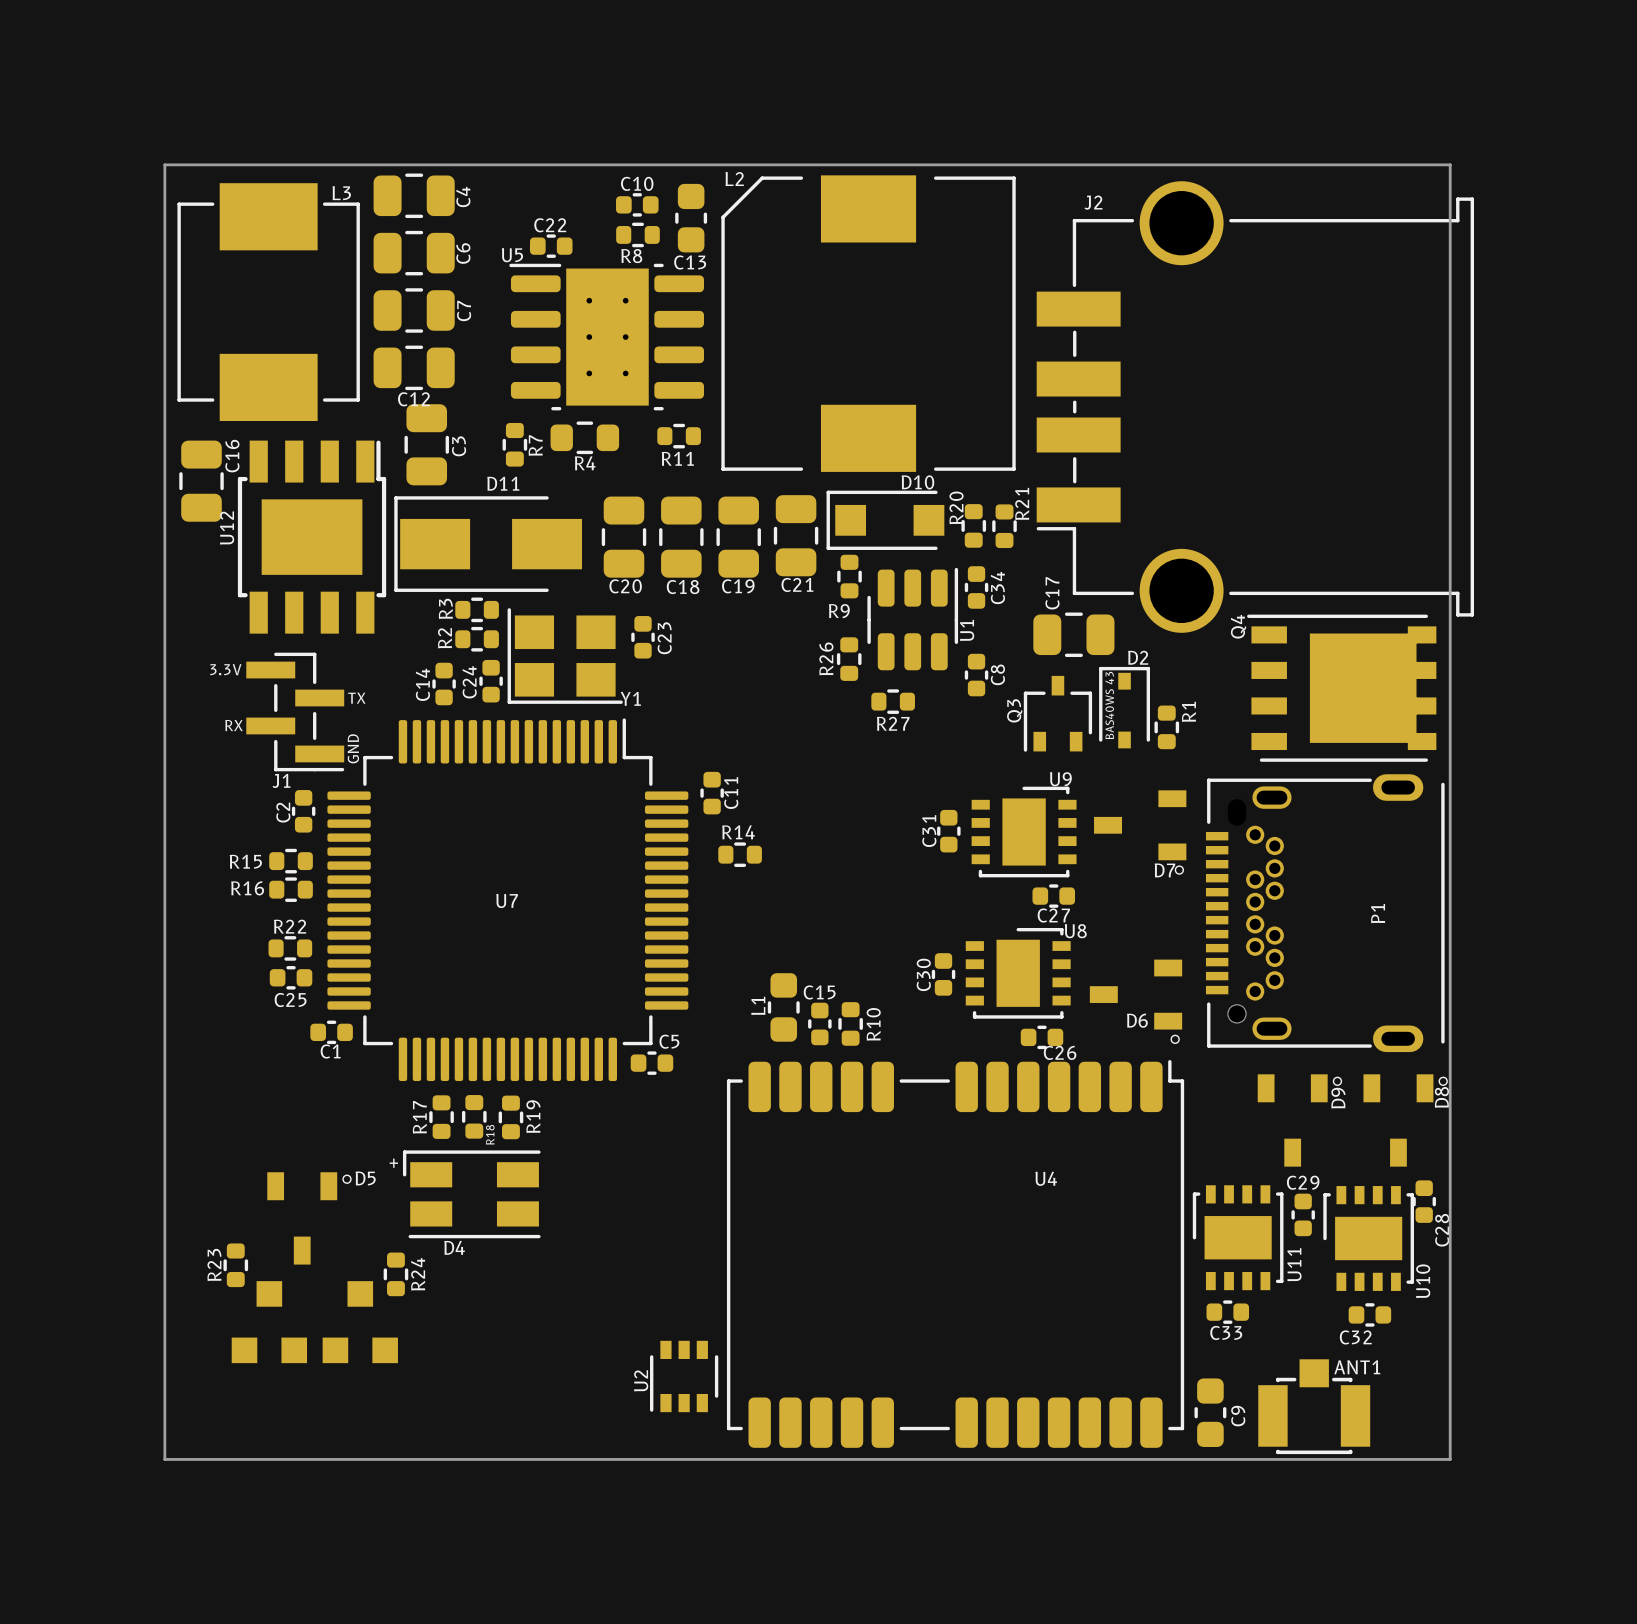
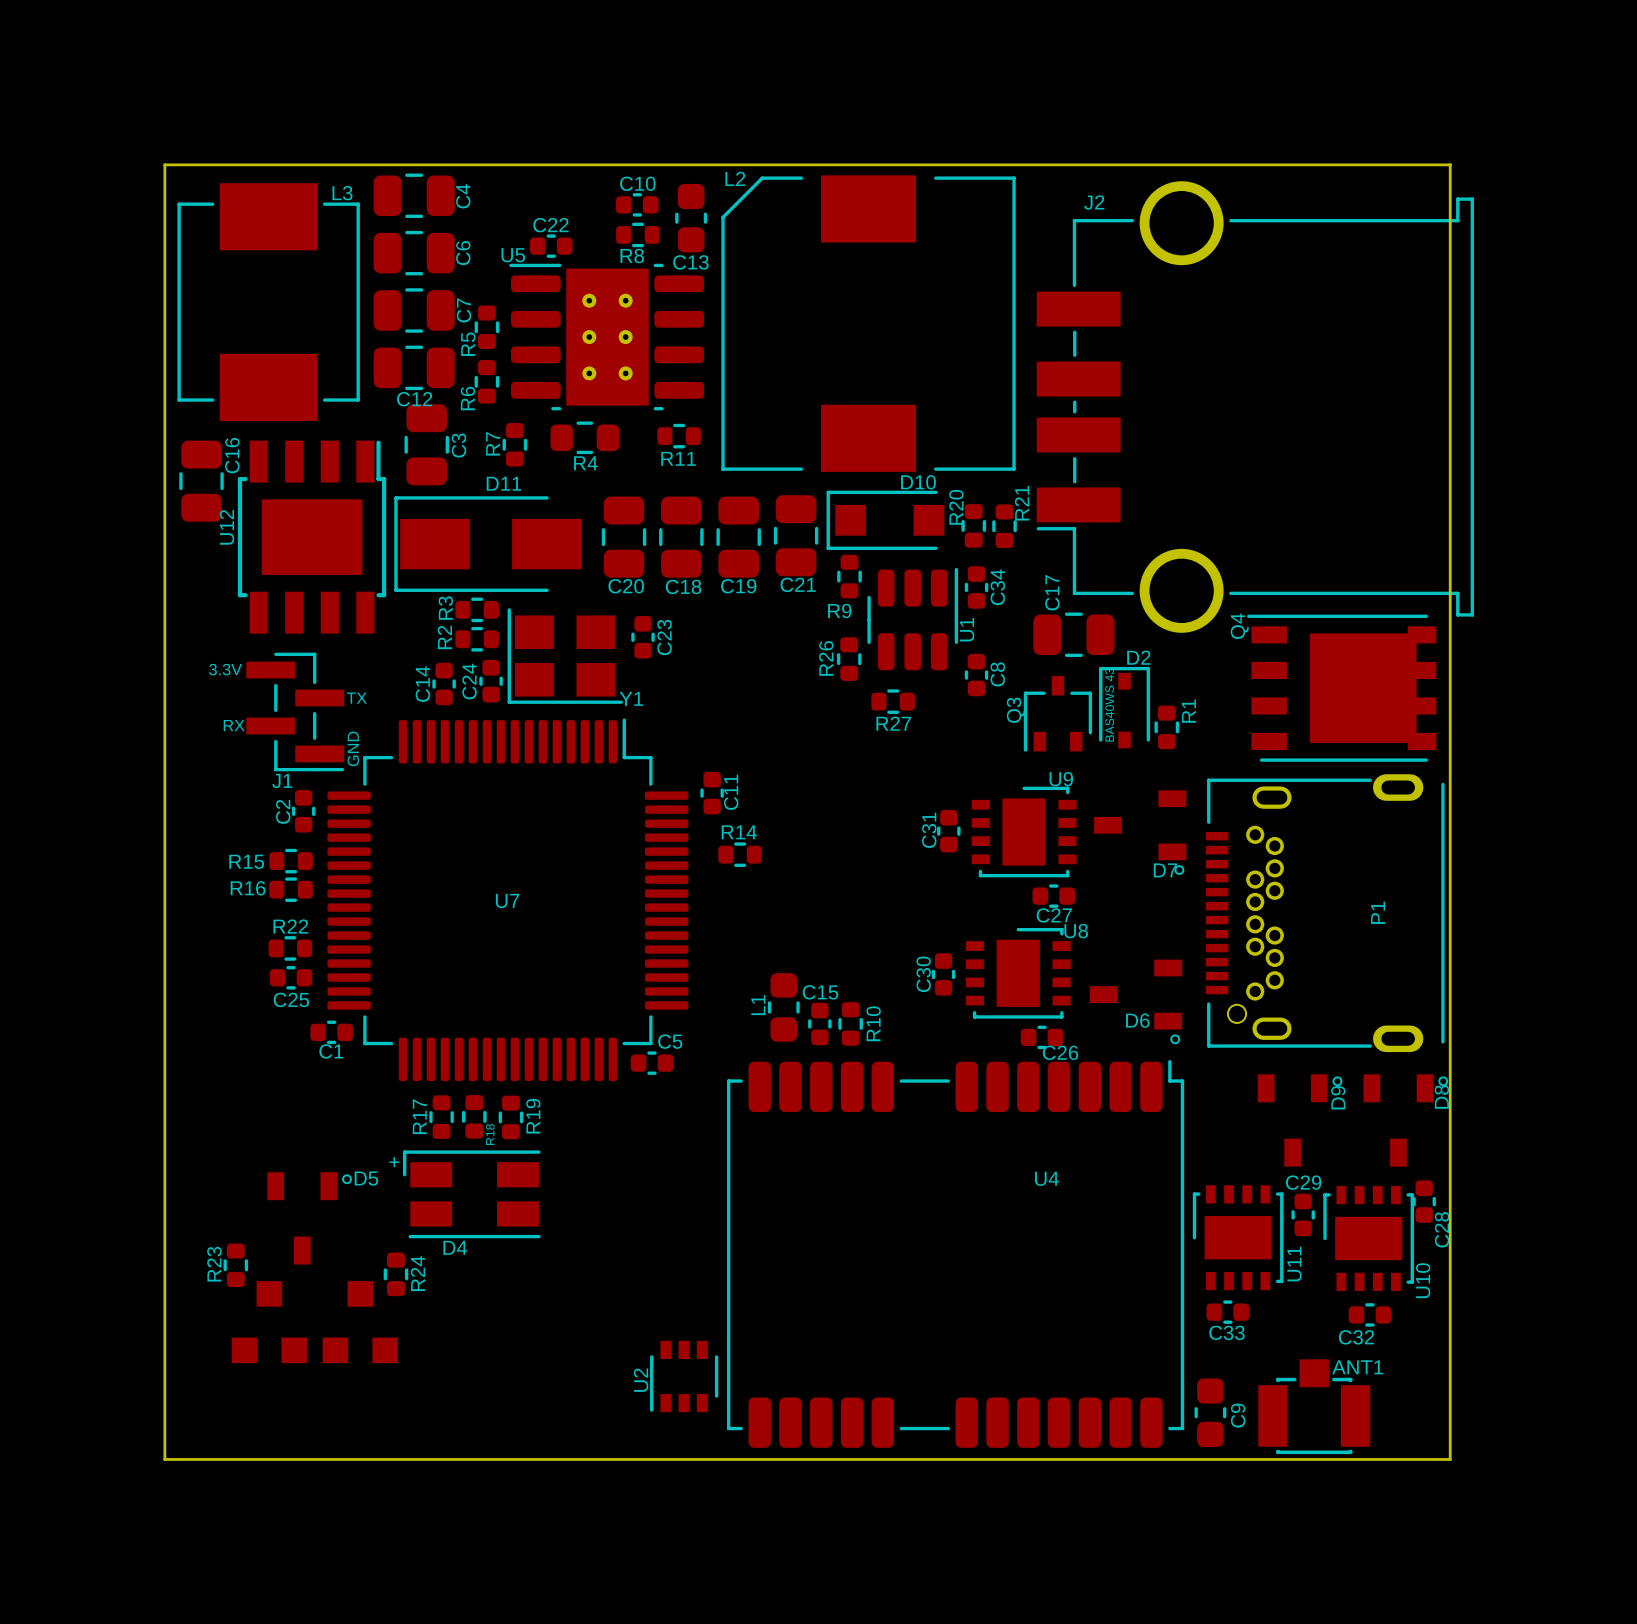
R5: none -> (486, 327)
R6: none -> (486, 381)
R7 name position: R7 (535, 445) -> R7 (493, 443)

